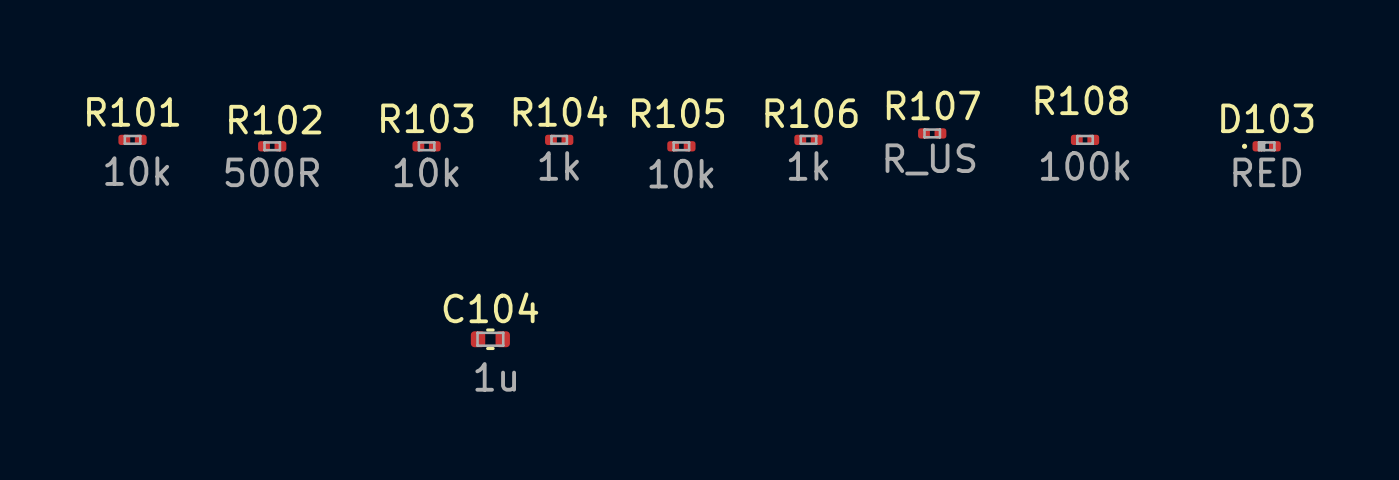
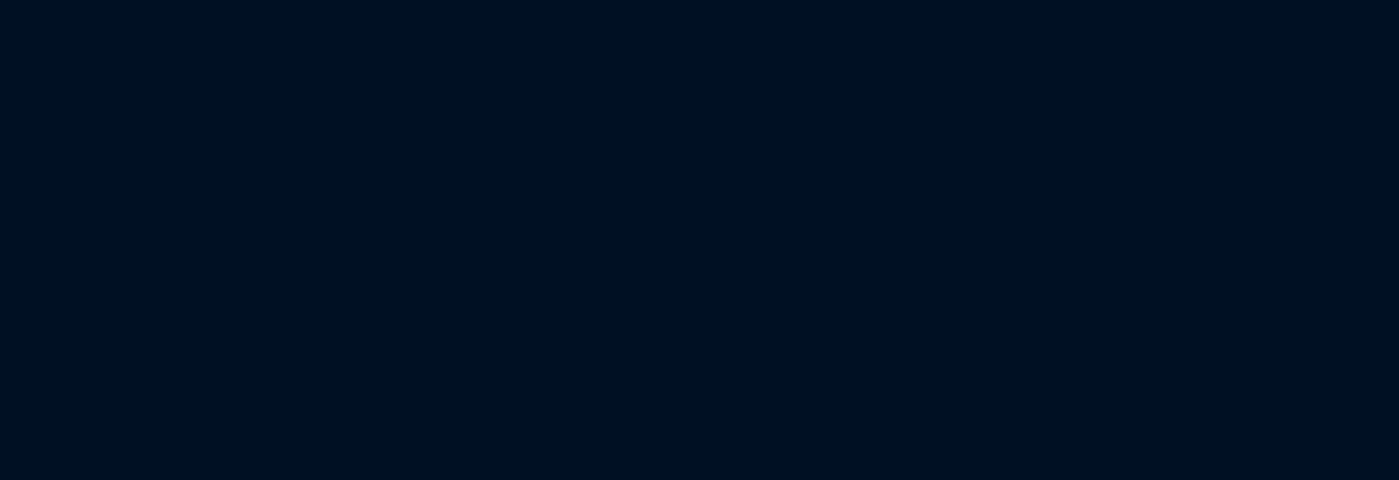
R107: R_US (932, 133) -> none
R101: 10k (132, 139) -> none
R104: 1k (559, 139) -> none
R106: 1k (808, 139) -> none
R108: 100k (1085, 139) -> none
R102: 500R (272, 146) -> none
R103: 10k (426, 146) -> none
R105: 10k (681, 146) -> none
D103: RED (1261, 146) -> none
C104: 1u (490, 339) -> none

